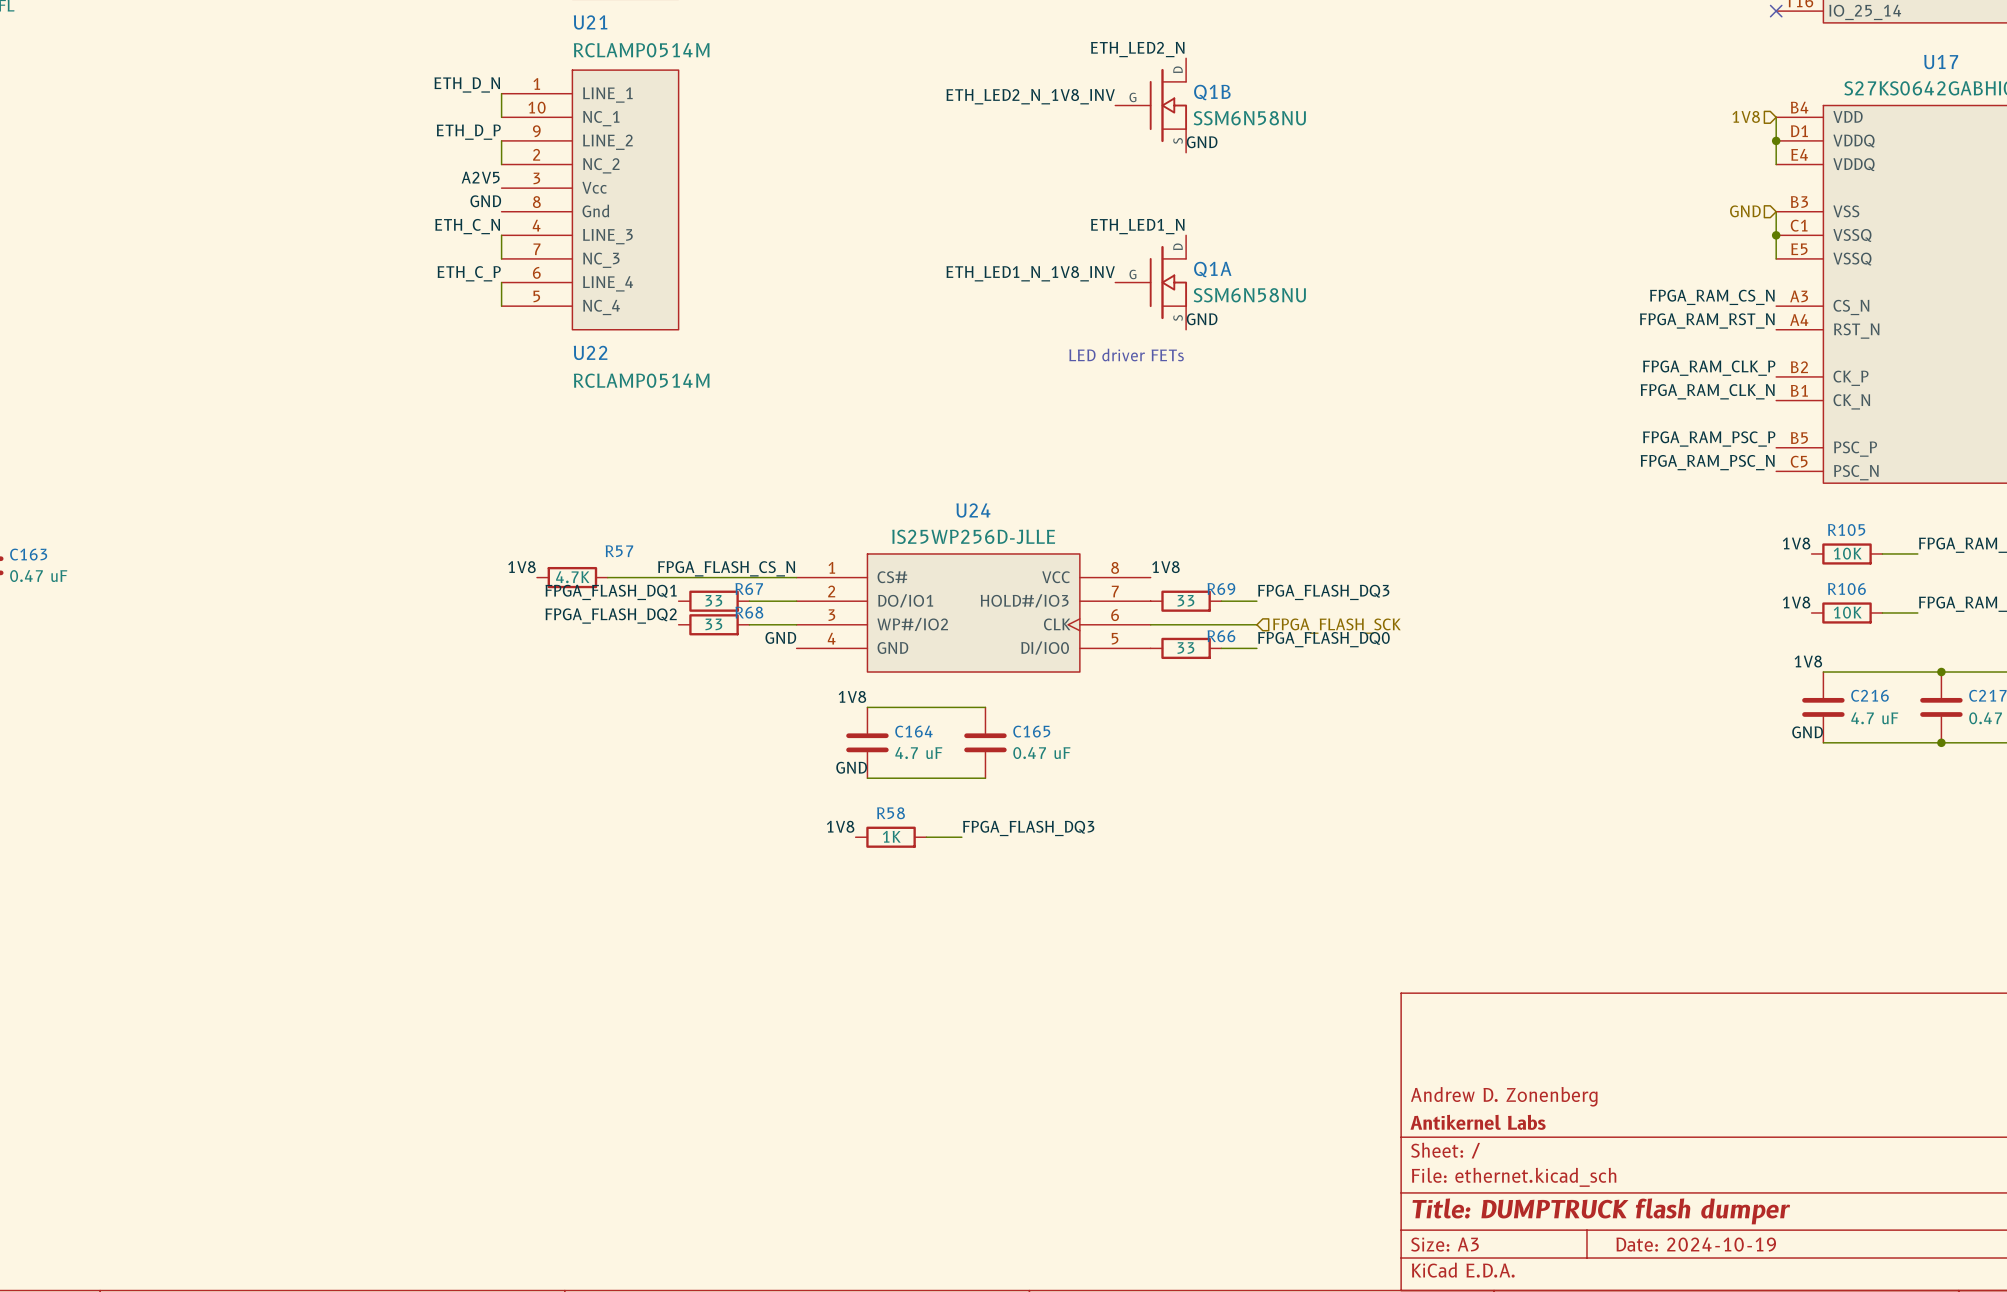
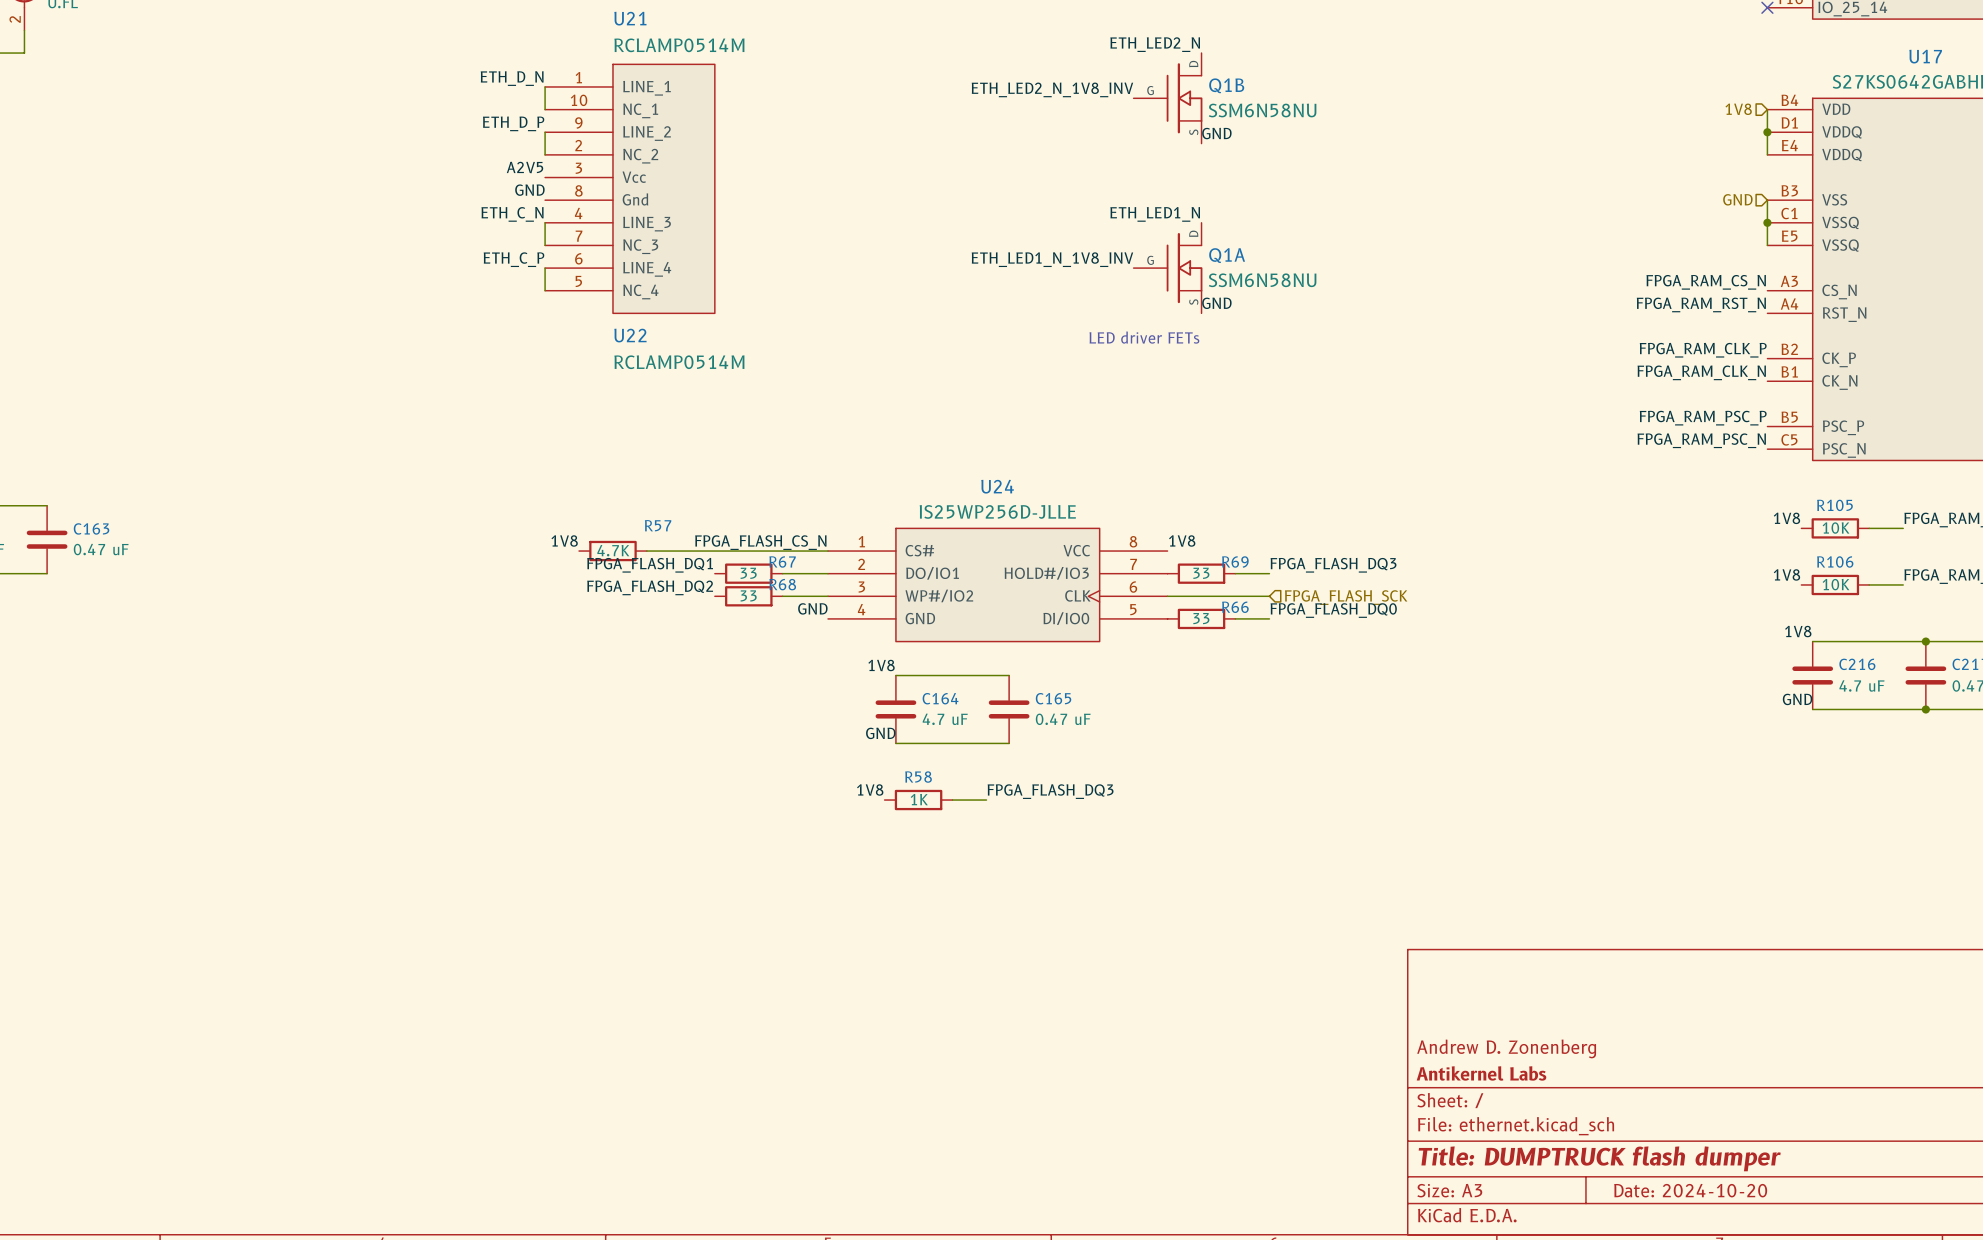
title block: Date: 2024-10-19 (1696, 1244) -> Date: 2024-10-20 (1690, 1190)

